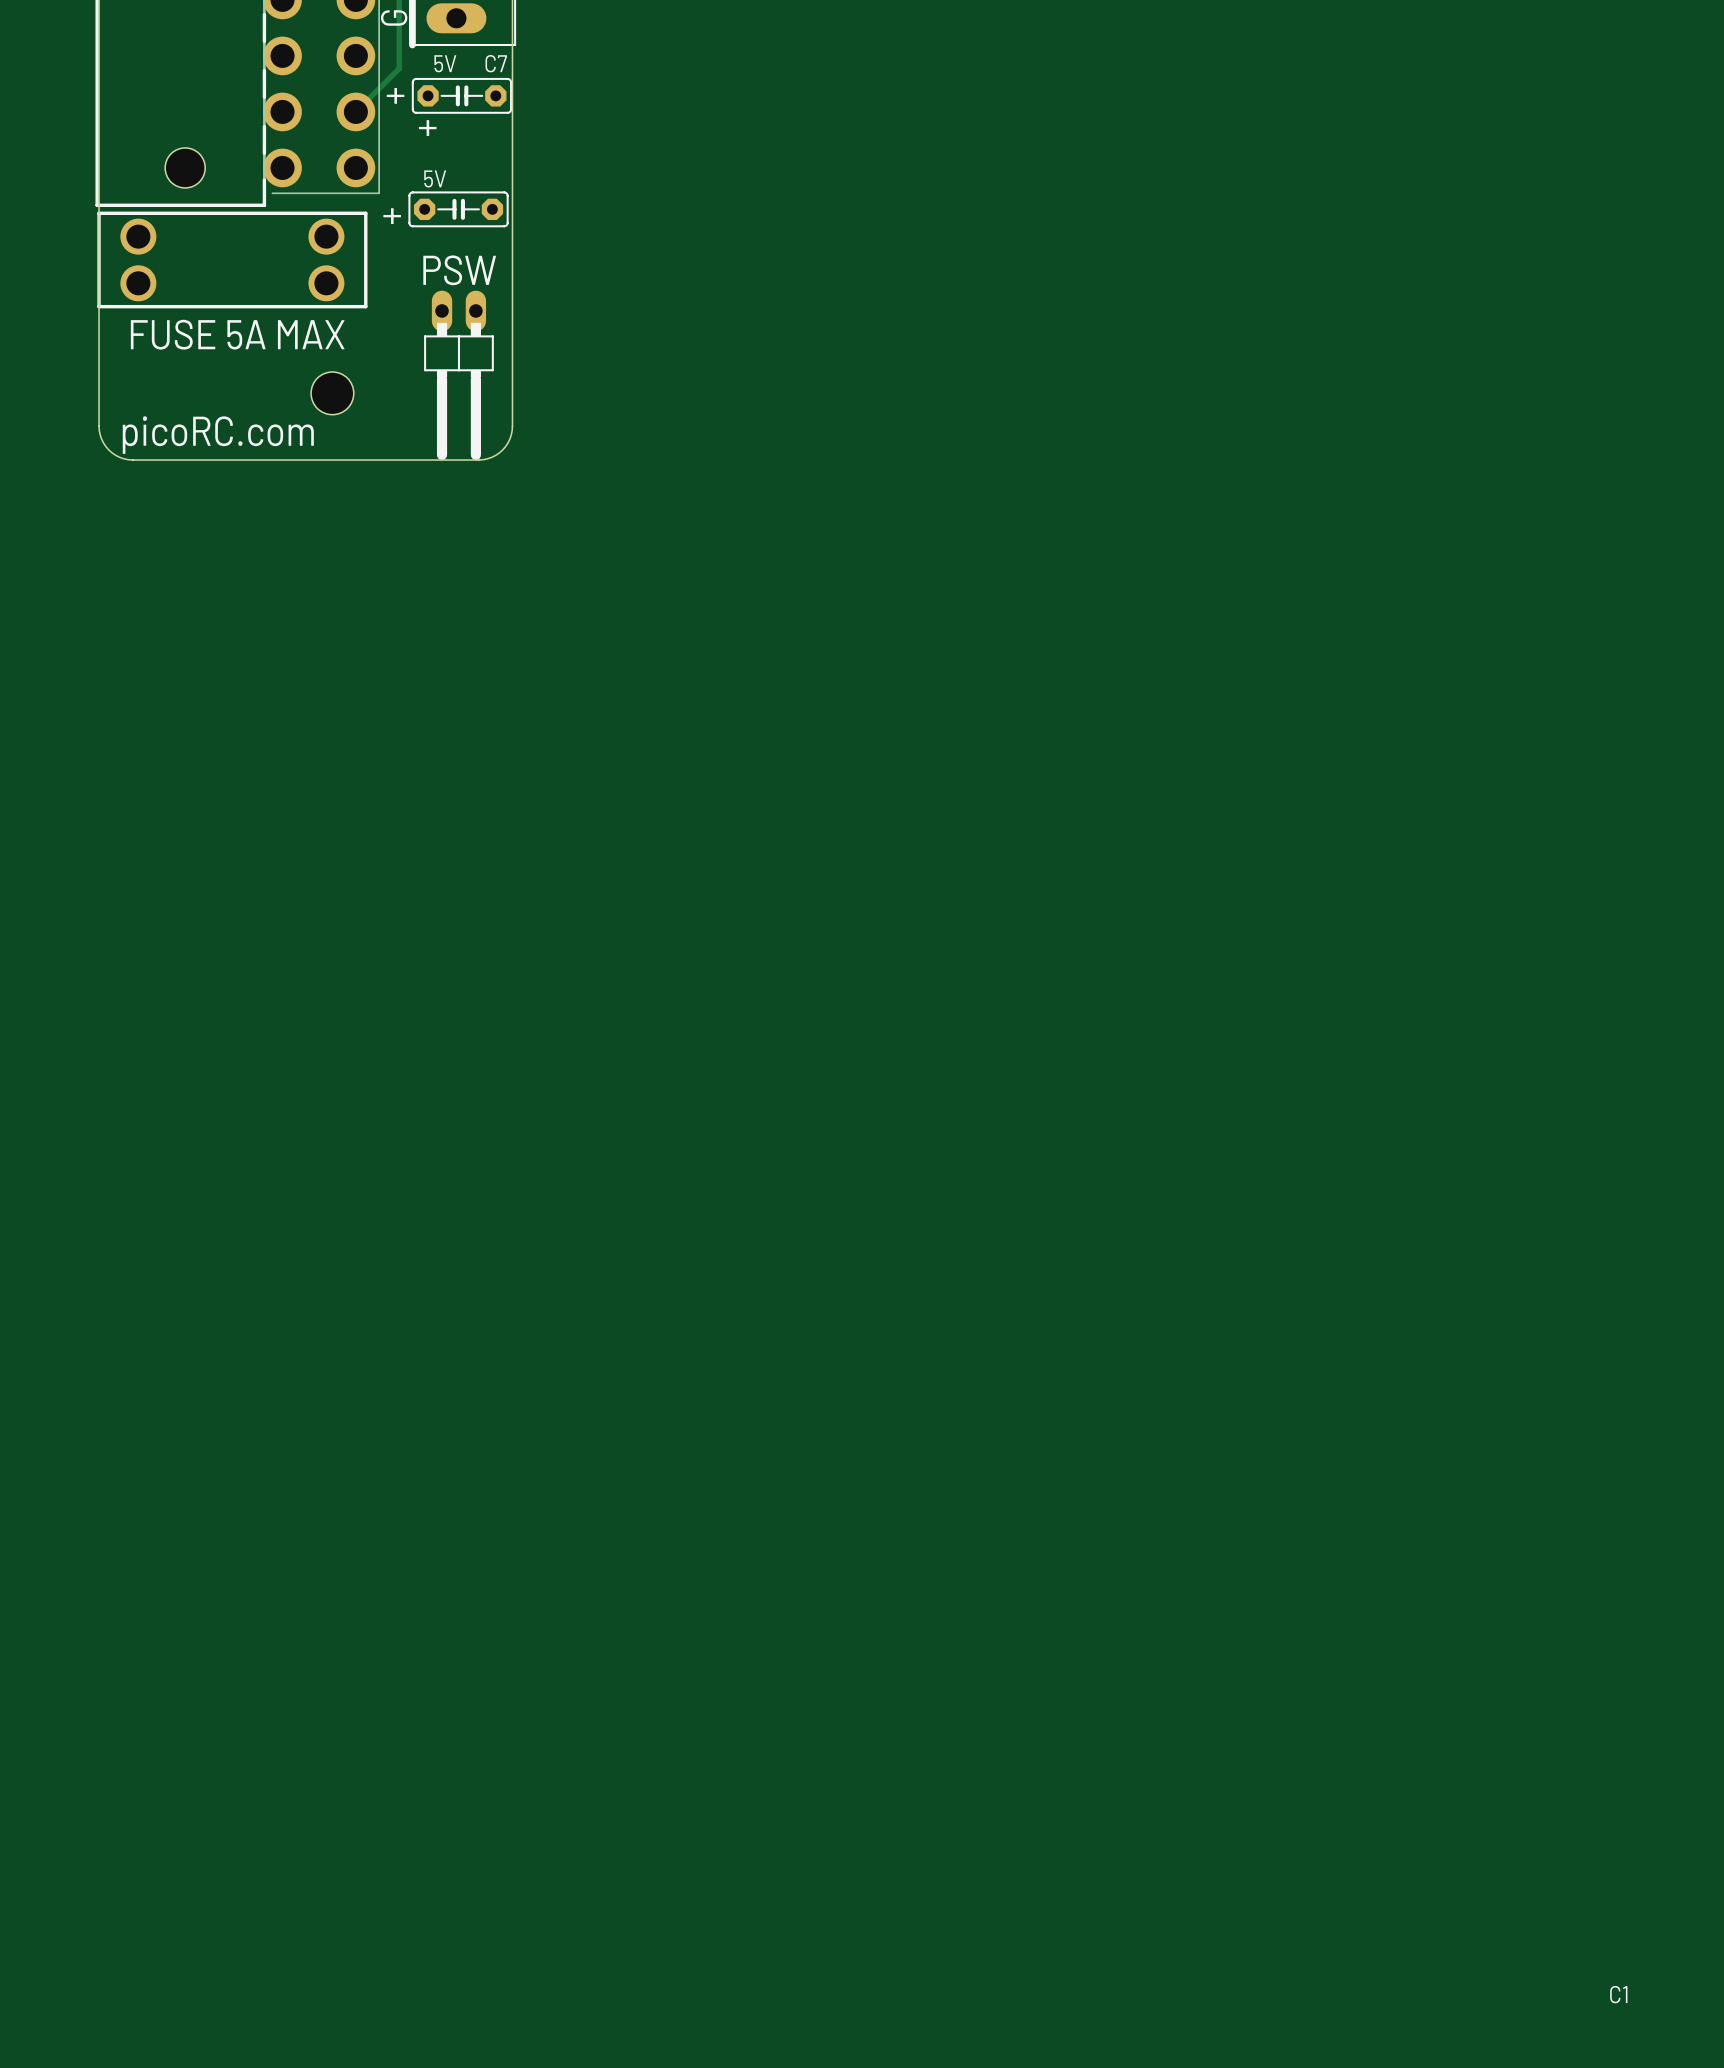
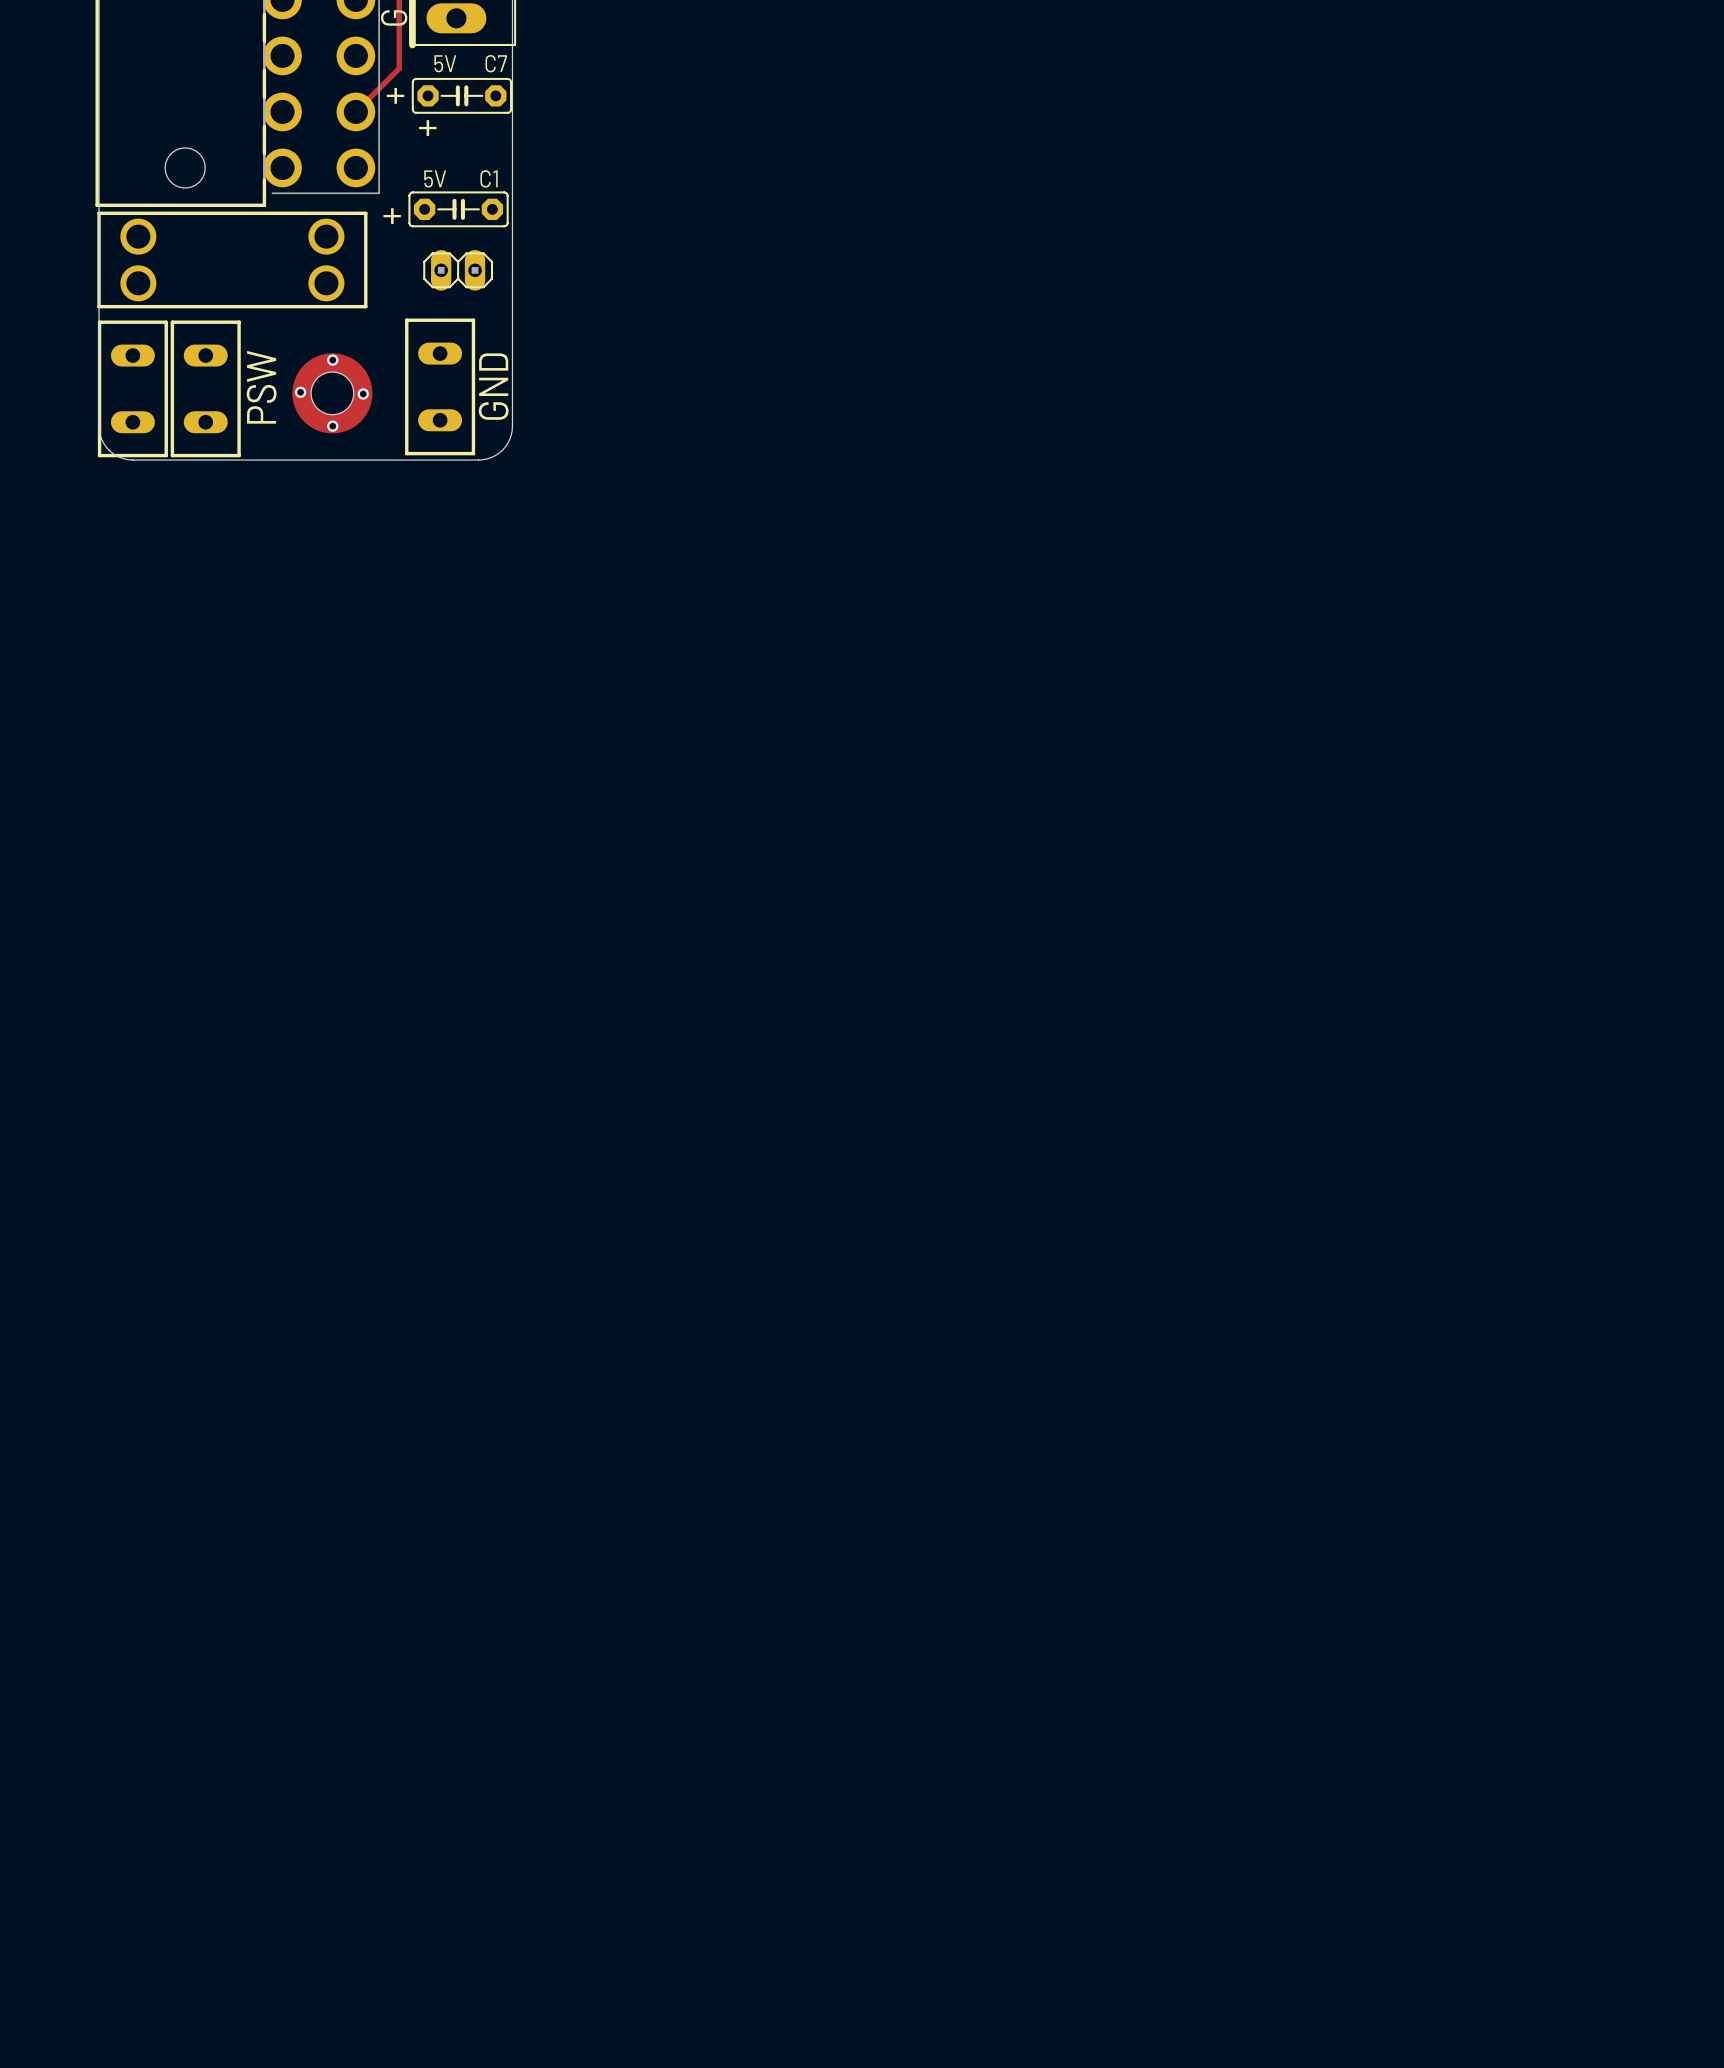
part: none -> (458, 270)
text rotation: 0° (459, 270) -> 90° counterclockwise (261, 387)
text position: PSW (459, 270) -> PSW (261, 387)
text: FUSE 5A MAX (237, 334) -> none
via: none -> (332, 360)
part footprint: [311, 372, 354, 415] -> [292, 353, 373, 434]
part: (458, 375) -> none
part: none -> (440, 386)
text: none -> GND (493, 386)
part: none -> (132, 388)
part: none -> (205, 388)
via: none -> (300, 392)
via: none -> (363, 393)
via: none -> (332, 426)
text: picoRC.com (218, 435) -> none
C1 name position: C1 (1618, 1994) -> C1 (489, 178)

